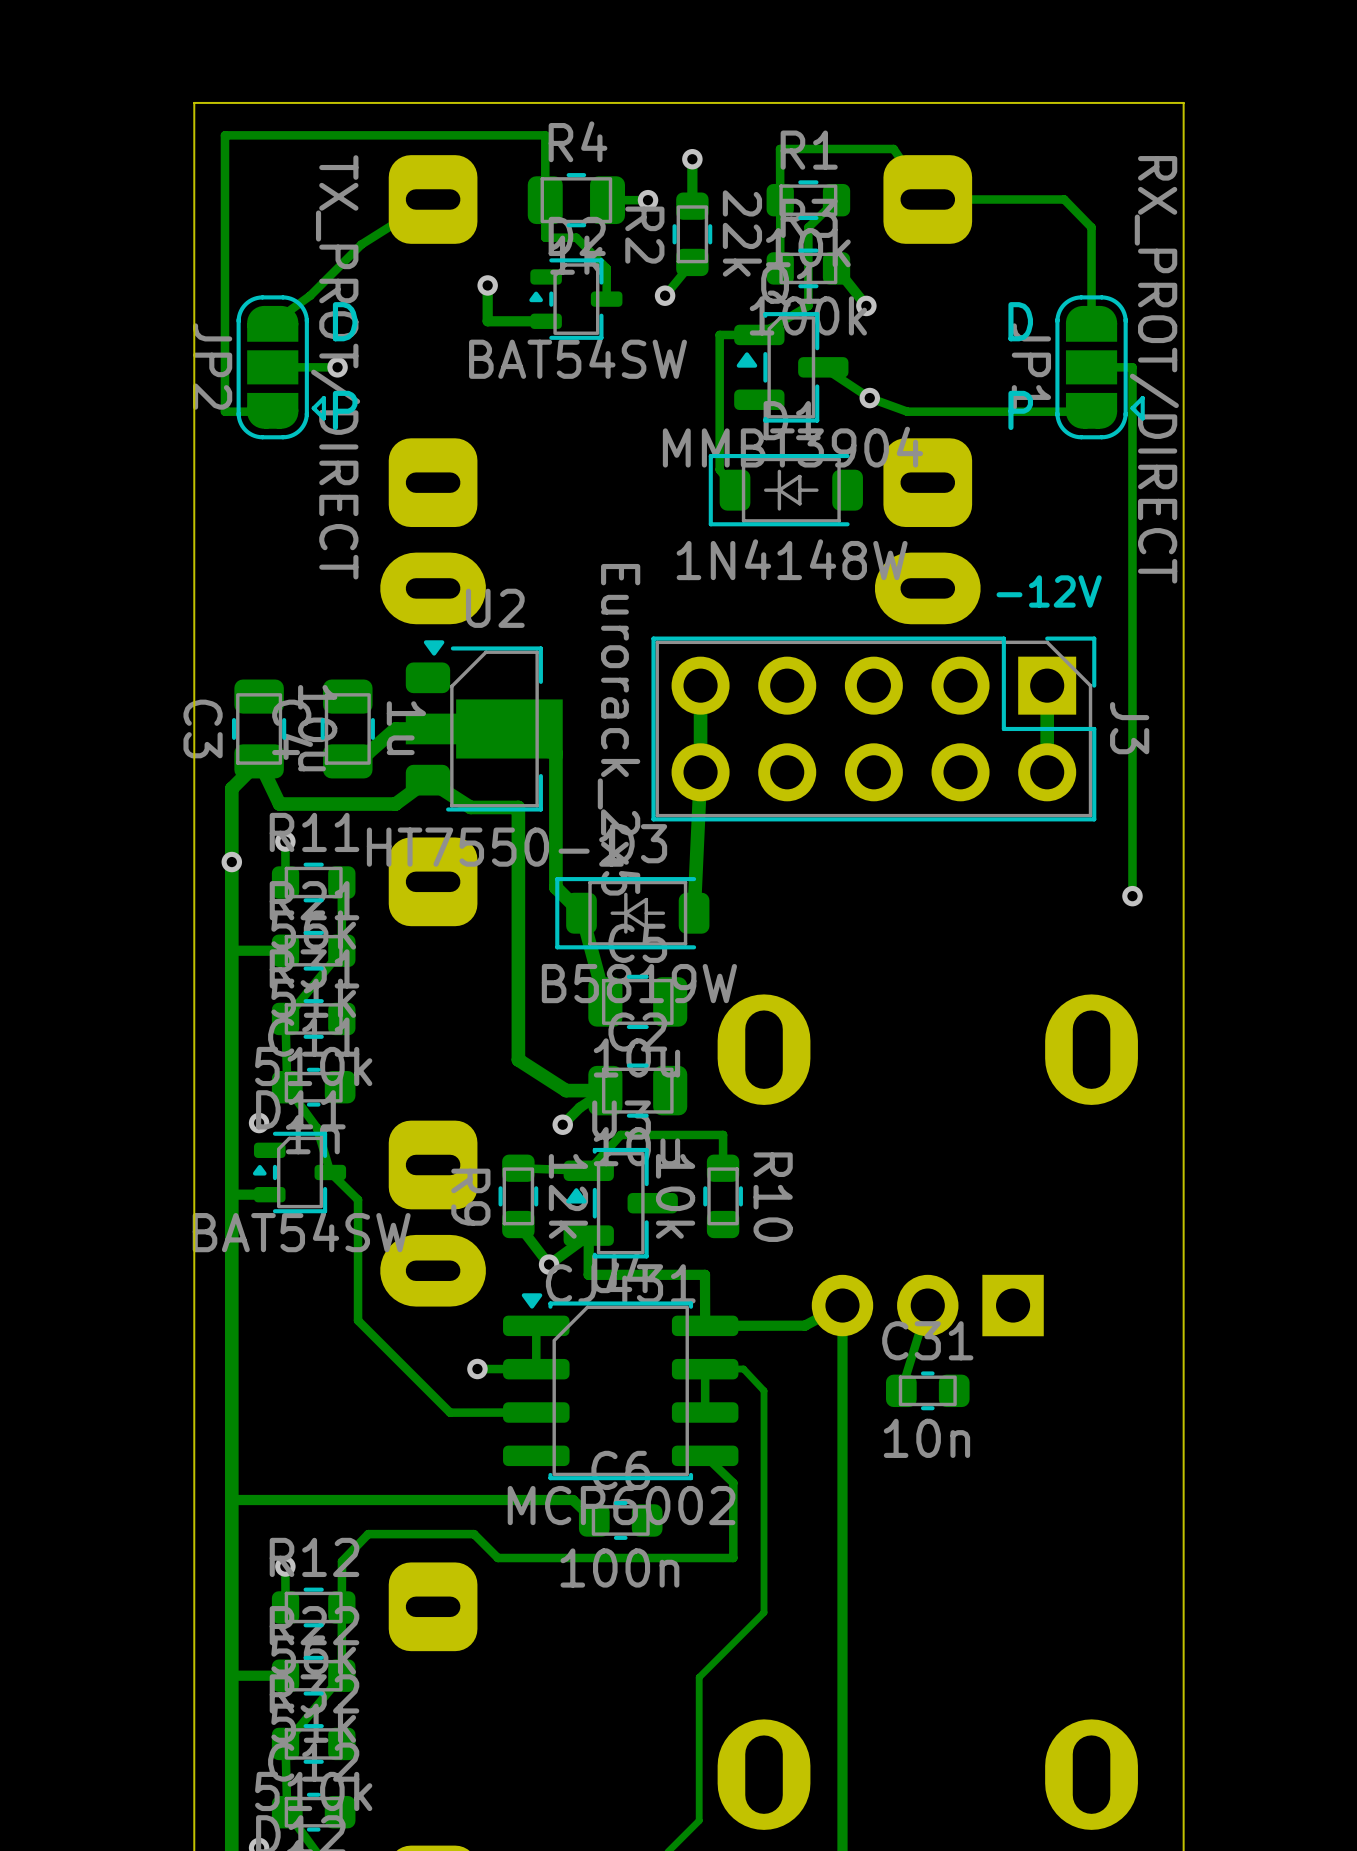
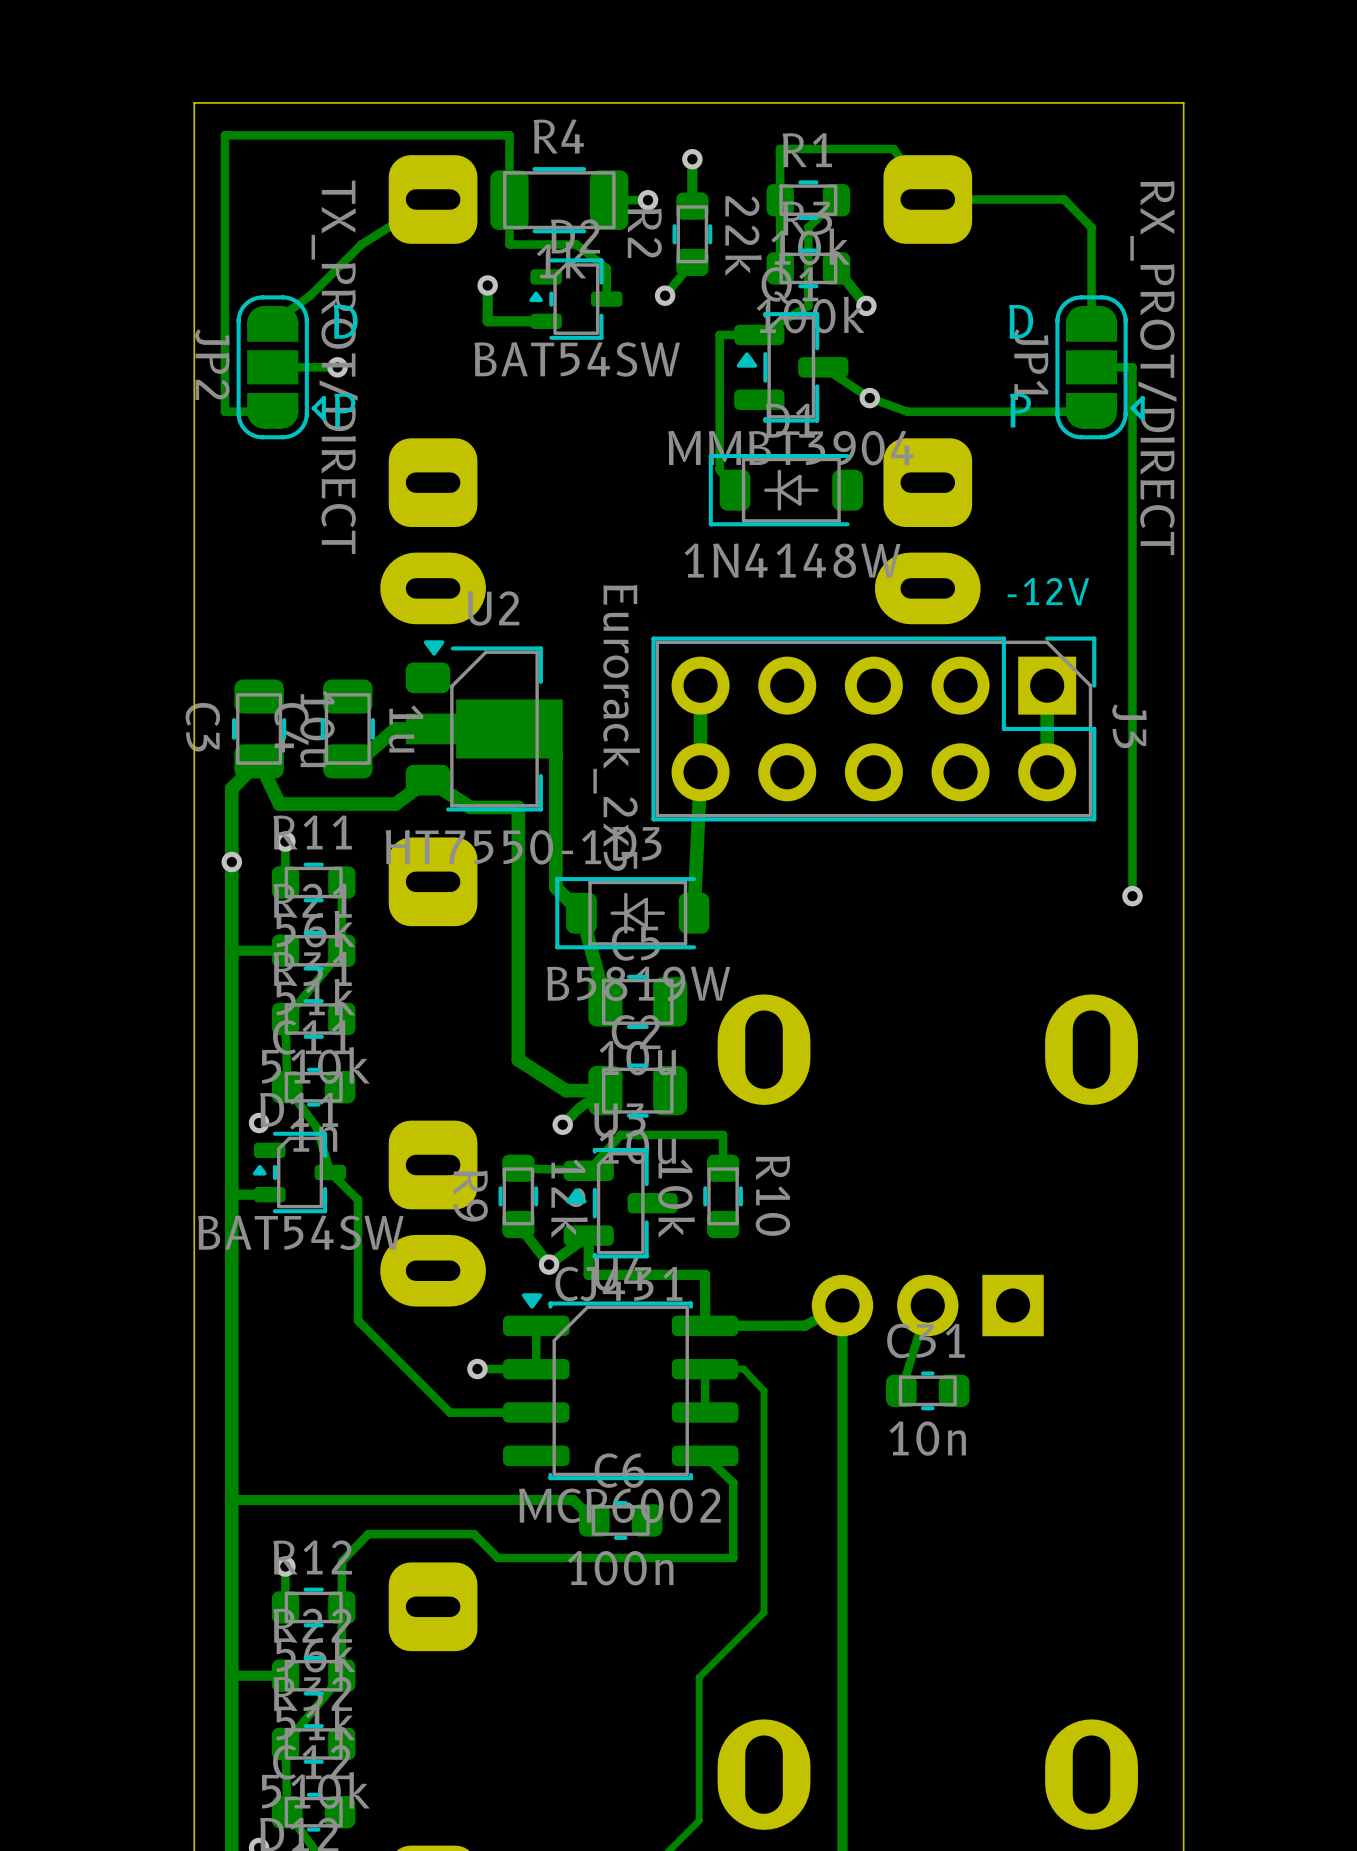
track: (509, 135) (545, 135) (545, 237) (576, 237) (606, 268) -> (509, 135) (509, 244) (576, 244) (606, 268)
R4 footprint: [527, 173, 625, 228] -> [490, 167, 629, 234]

